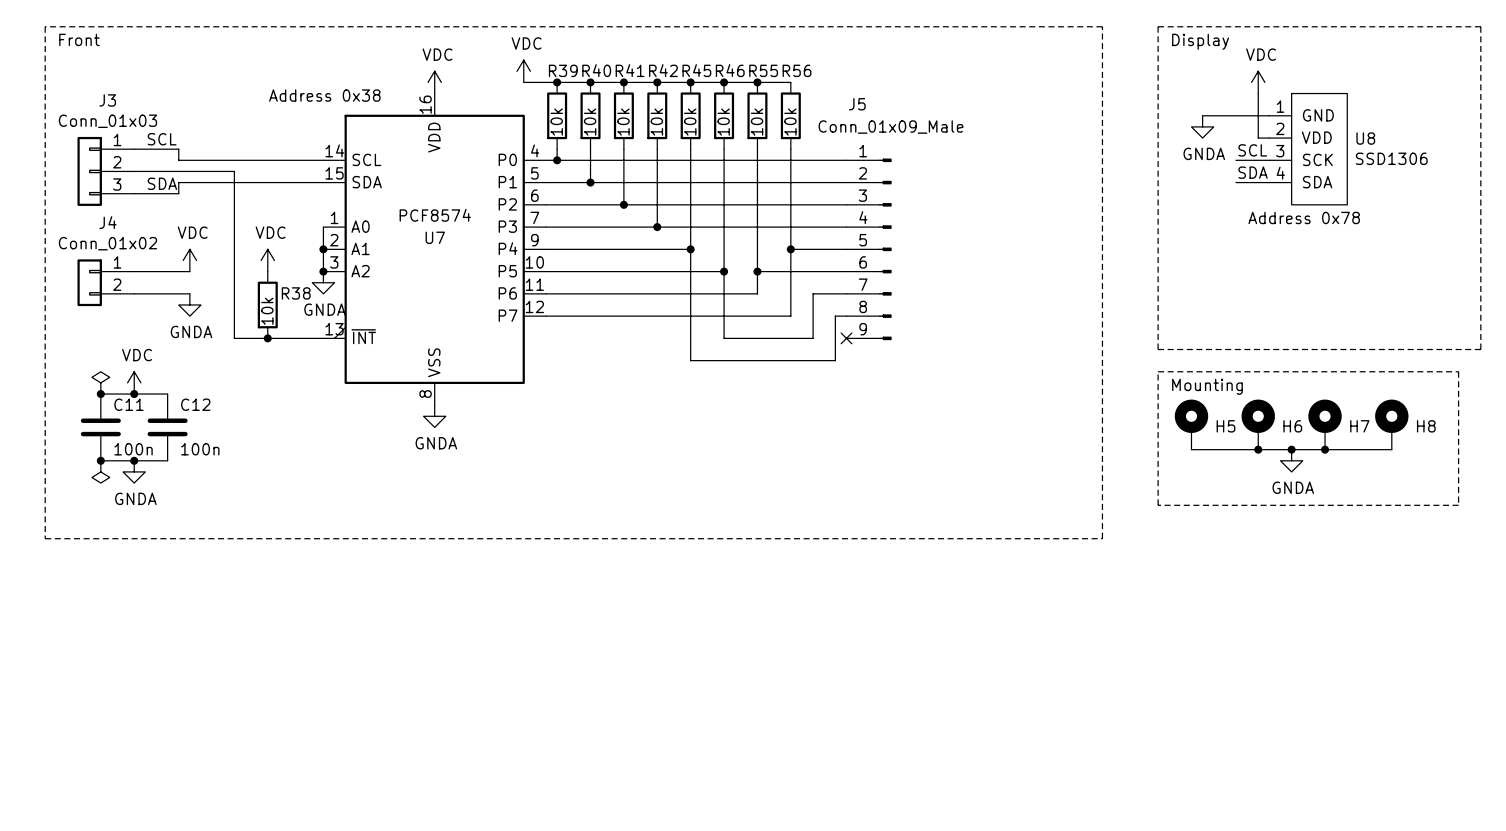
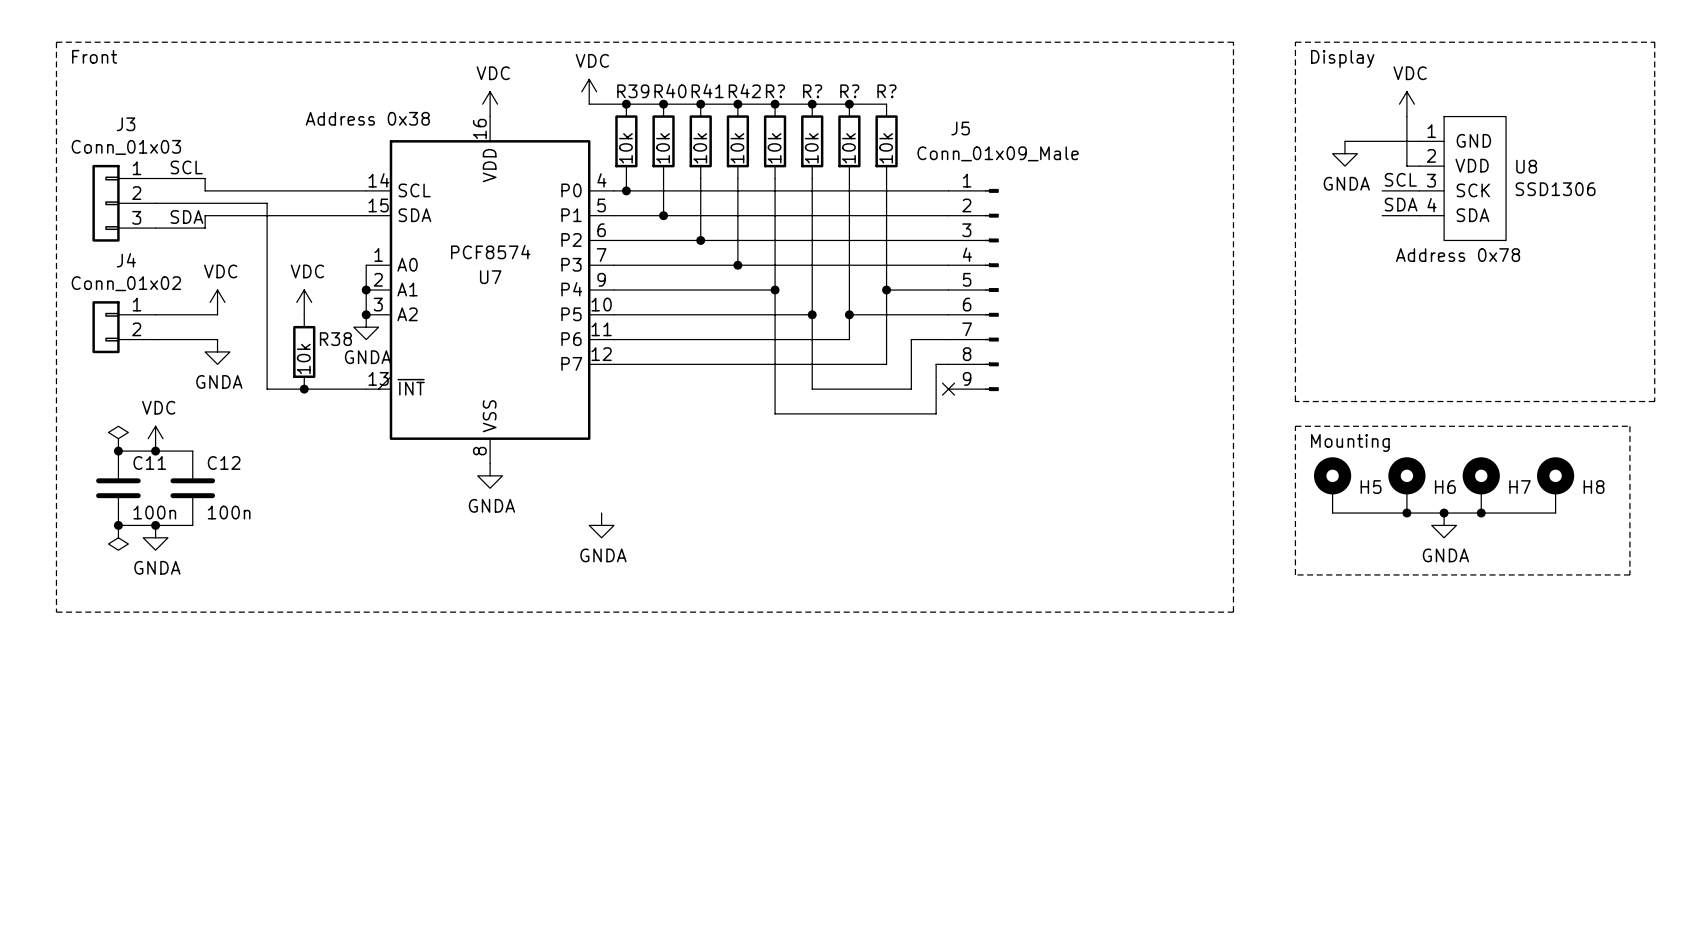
R45 name: R45 (696, 70) -> R? (775, 91)
R46 name: R46 (730, 70) -> R? (812, 91)
R55 name: R55 (763, 70) -> R? (849, 91)
R56 name: R56 (797, 70) -> R? (886, 91)
power symbol: none -> GNDA (601, 525)

